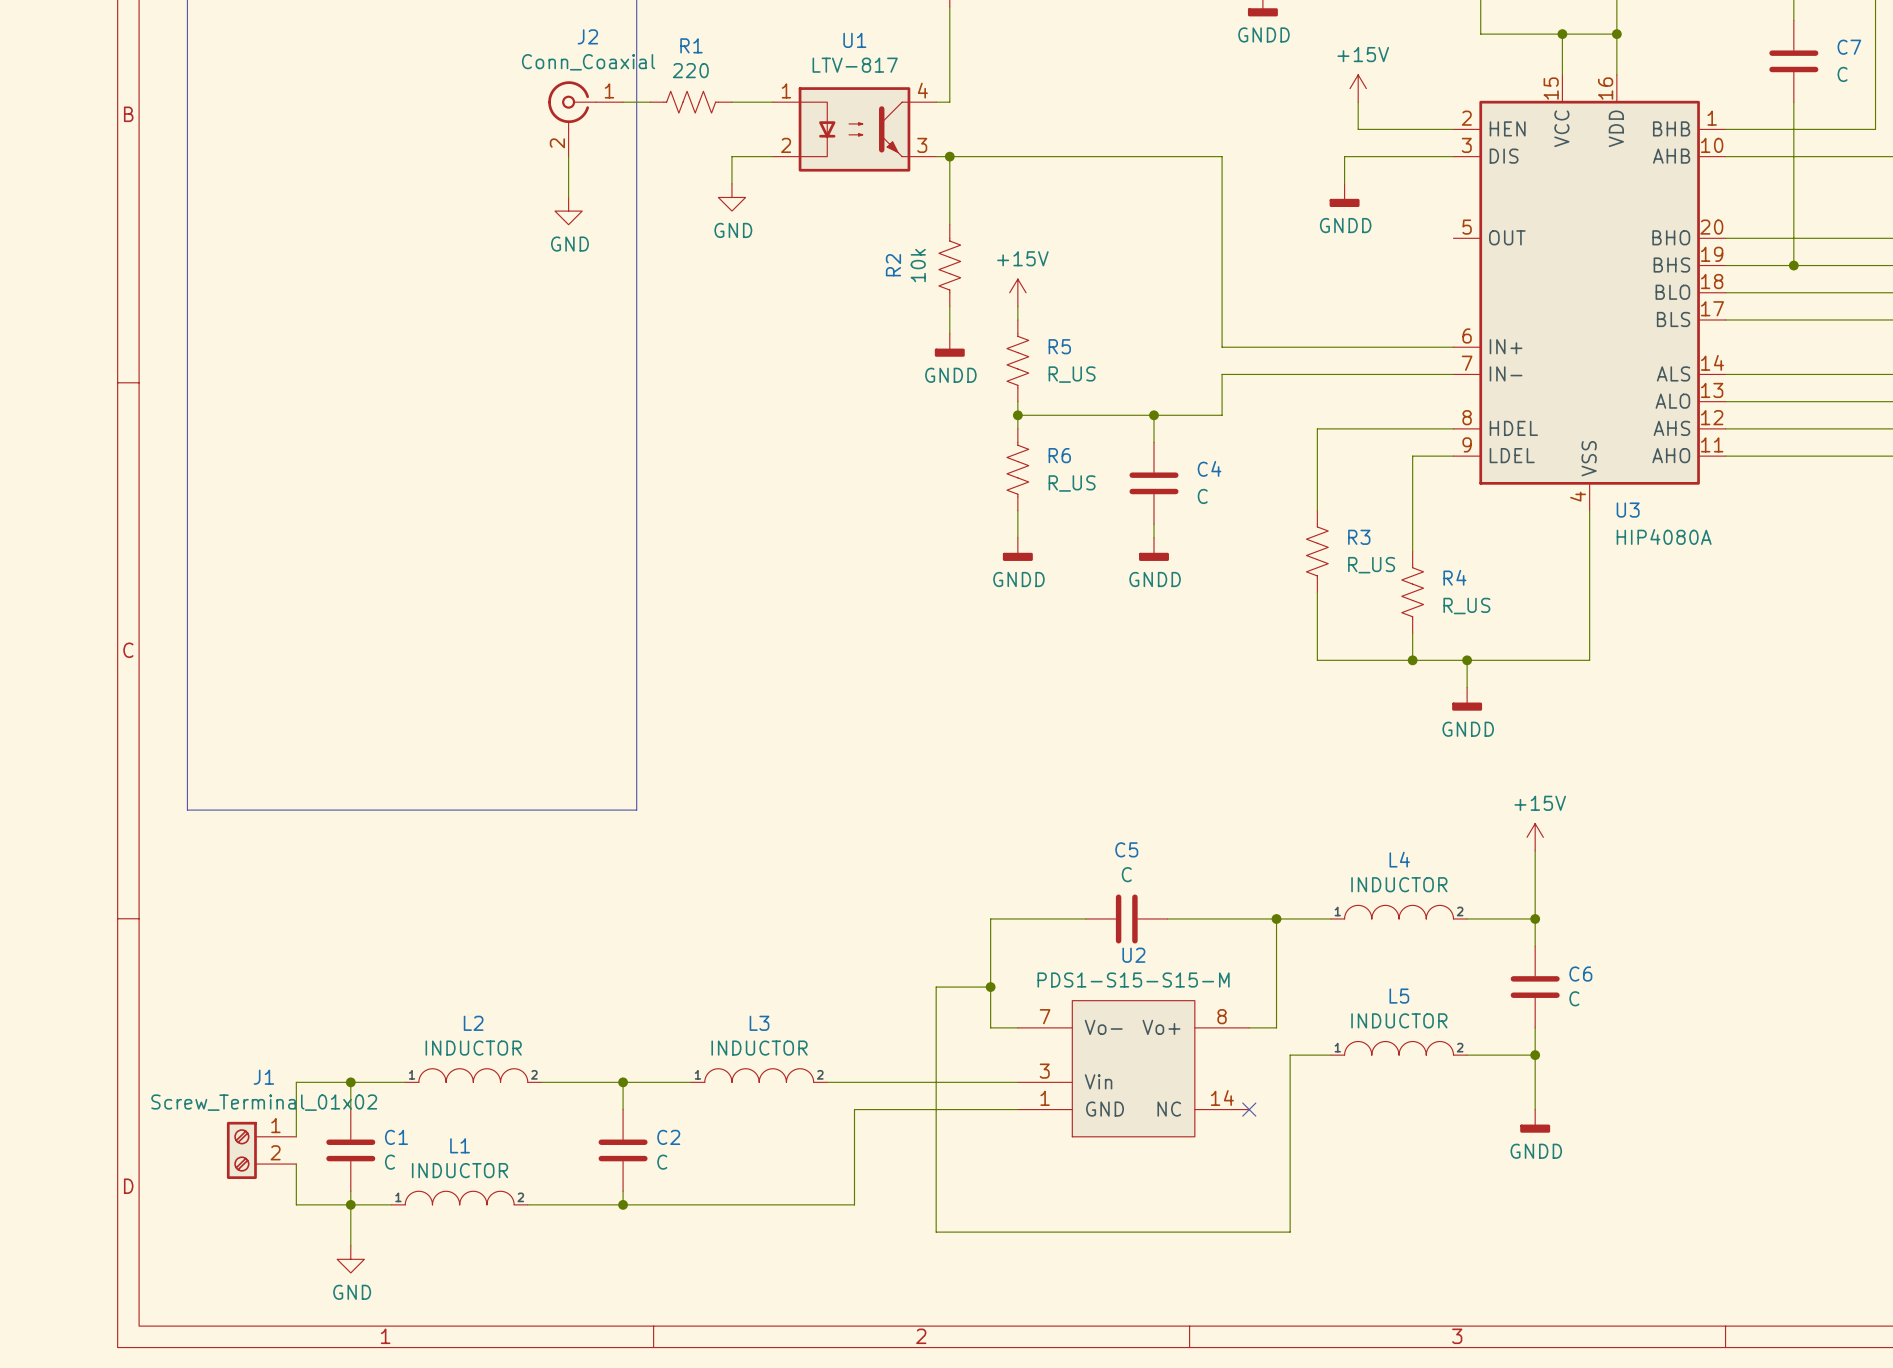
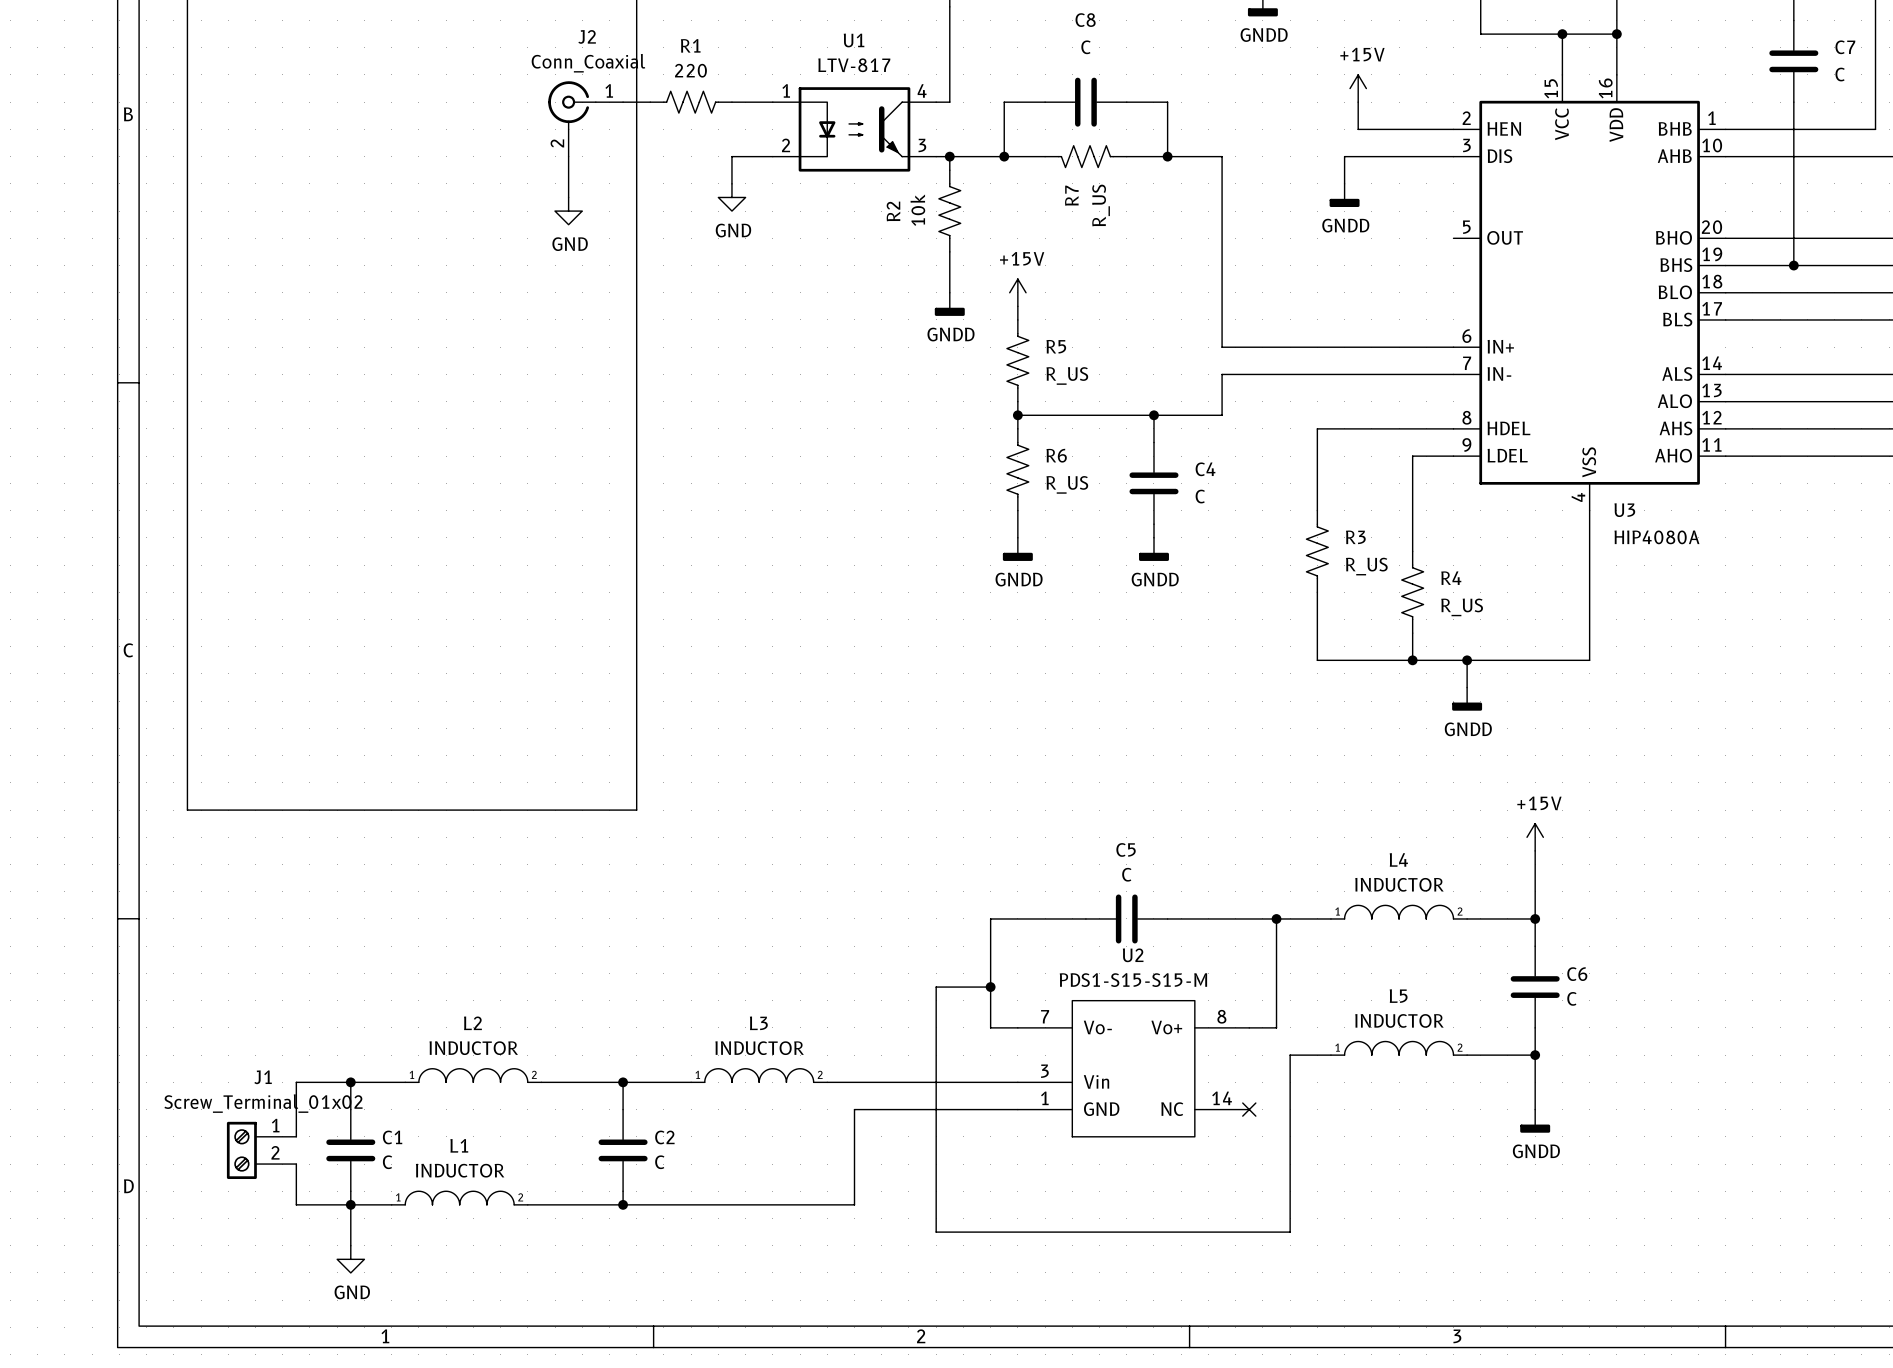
wire: none -> (1045, 102) (1004, 102) (1004, 156)
C8: none -> C (1085, 102)
wire: none -> (1126, 102) (1167, 102) (1167, 156)
junction: none -> (1004, 156)
R7: none -> R_US (1085, 156)
junction: none -> (1167, 156)
wire: (949, 170) (949, 224) -> none
wire: none -> (949, 251) (949, 292)
R2 position: (949, 265) -> (949, 211)
wire: (949, 306) (949, 333) -> none
power symbol position: GNDD (949, 345) -> GNDD (949, 304)

